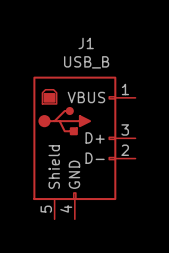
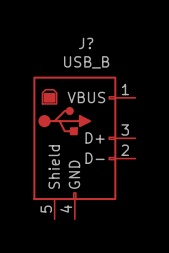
J1 name: J1 (86, 43) -> J? (86, 43)

